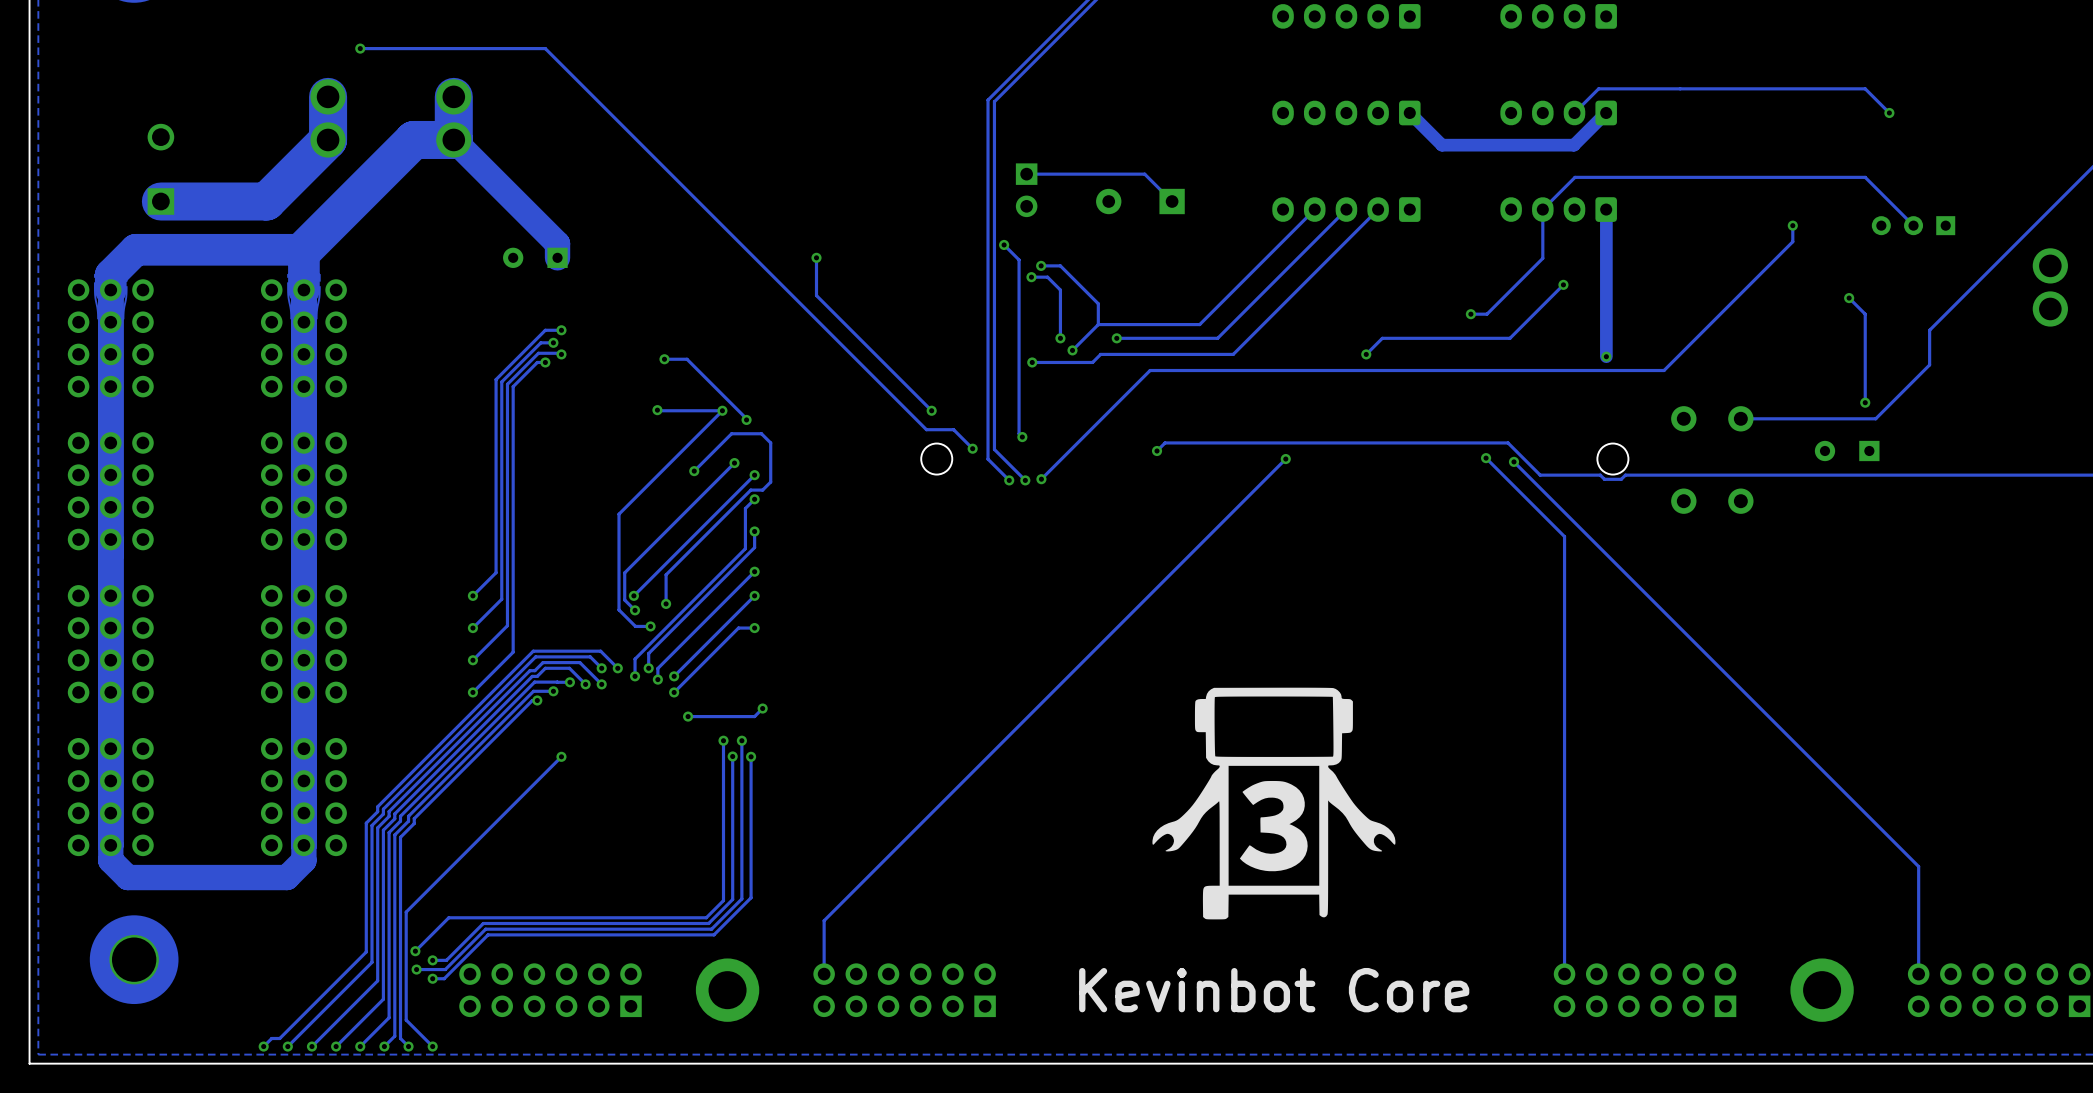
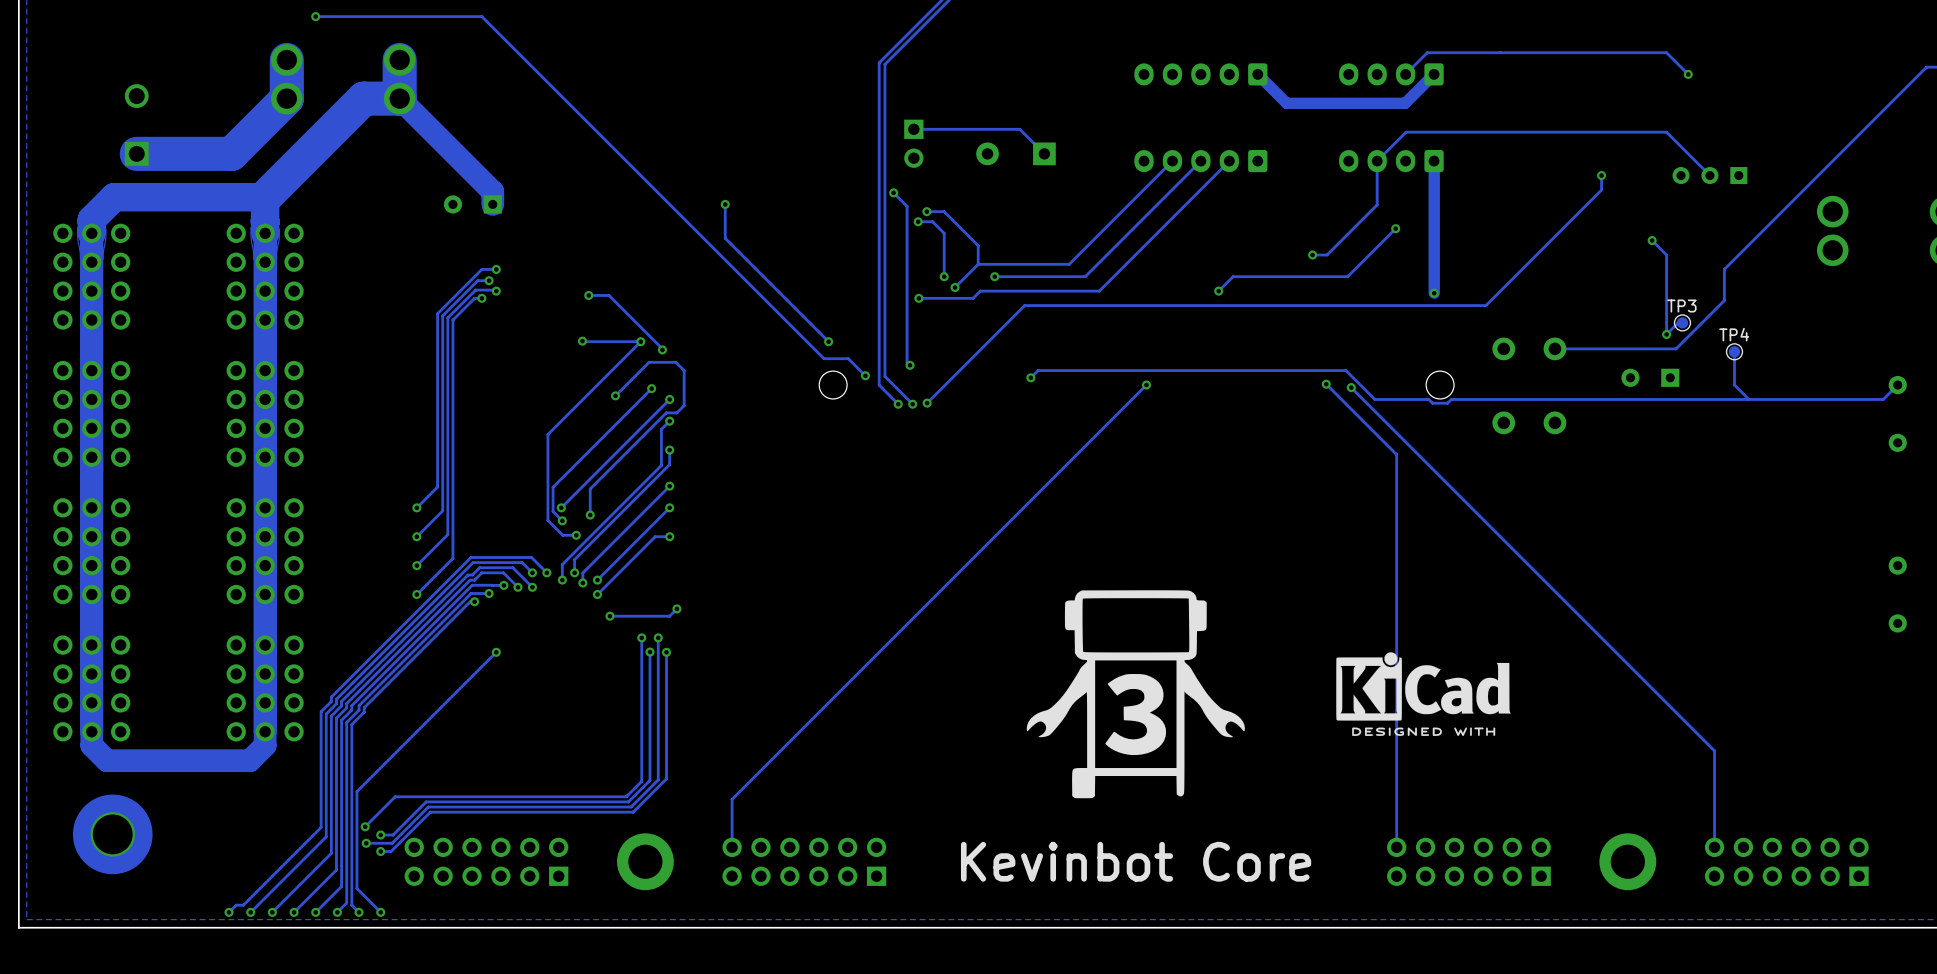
track: none -> (1682, 322) (1678, 322) (1666, 334)
TP3: none -> (1682, 322)
track: none -> (1734, 351) (1734, 385) (1748, 399)
TP4: none -> (1734, 351)
drawing: none -> [1336, 652, 1511, 736]

